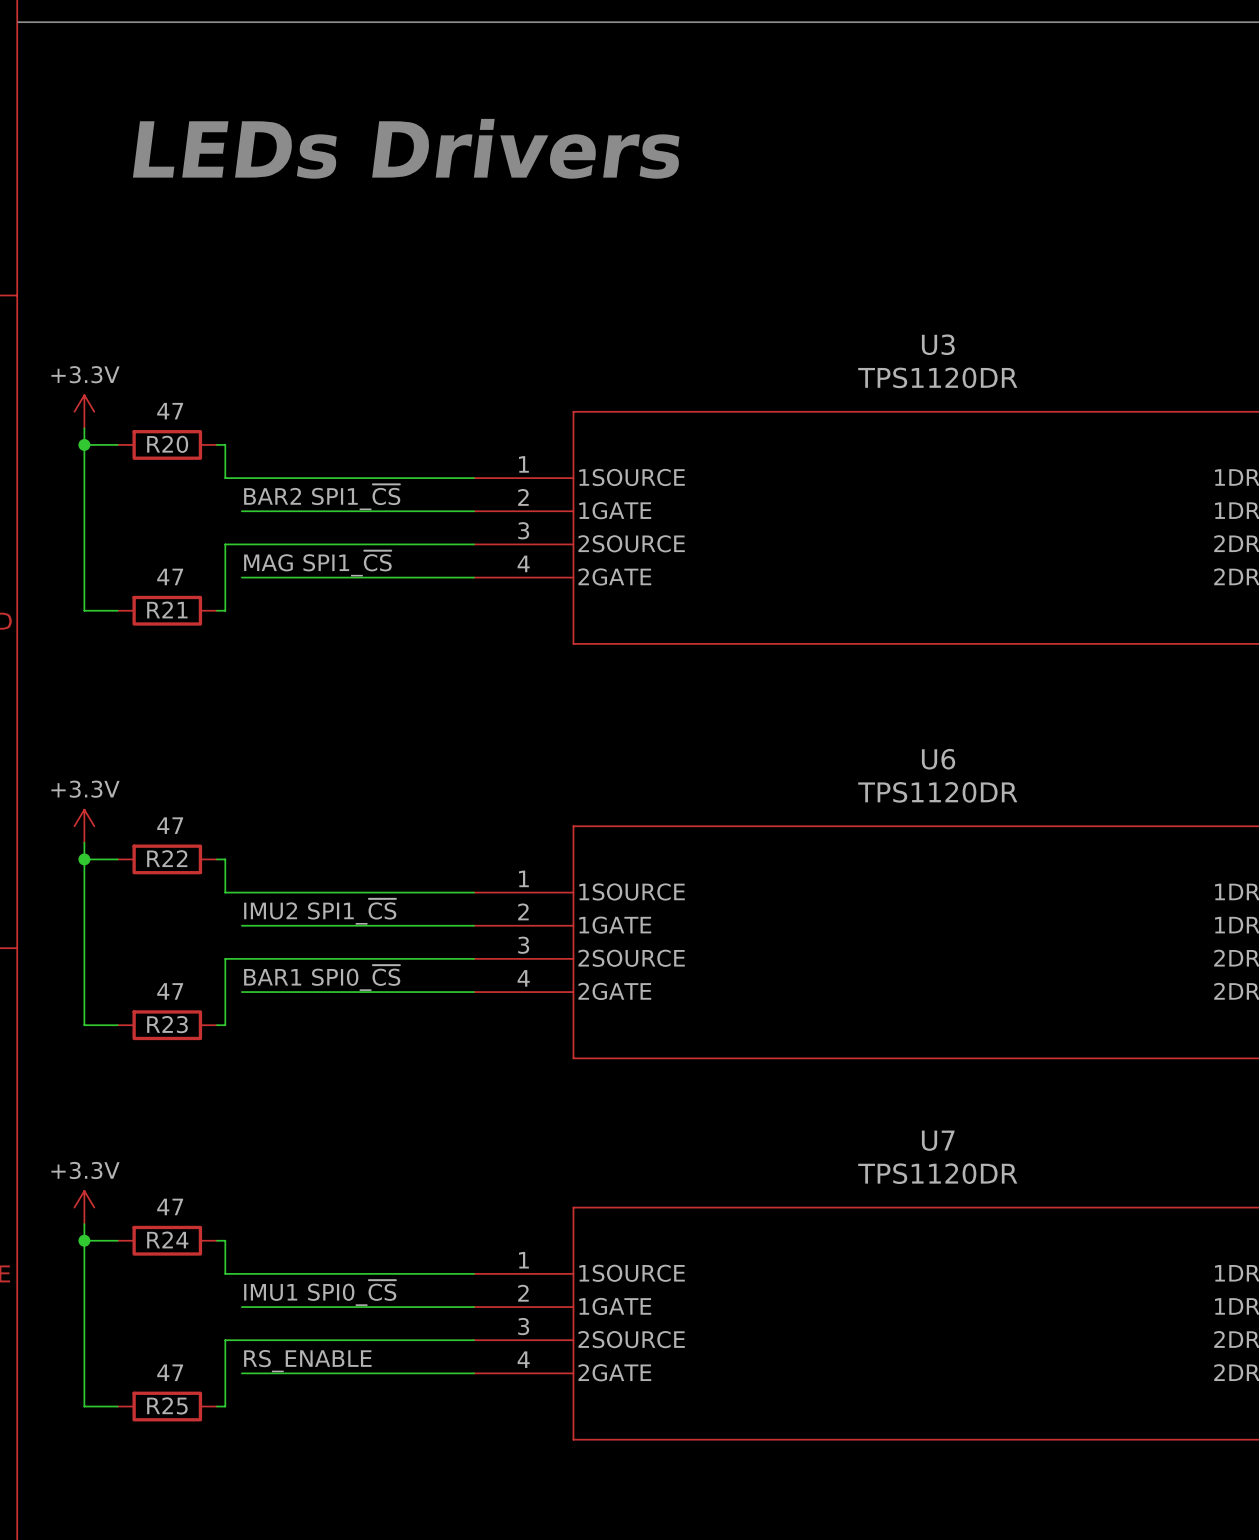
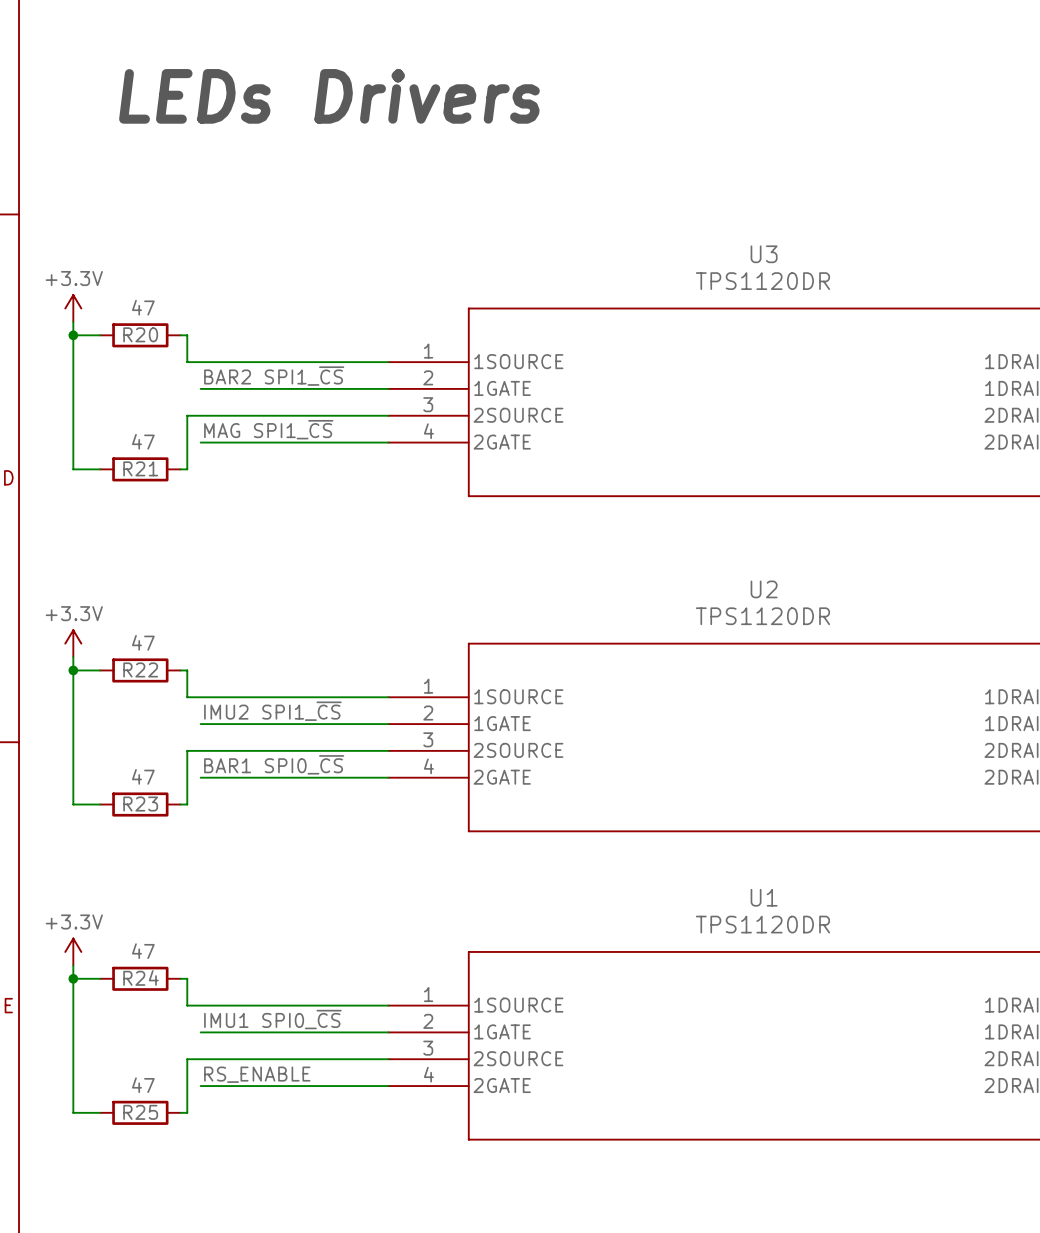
U6 name: U6 (938, 759) -> U2 (764, 589)
U7 name: U7 (938, 1140) -> U1 (764, 897)

